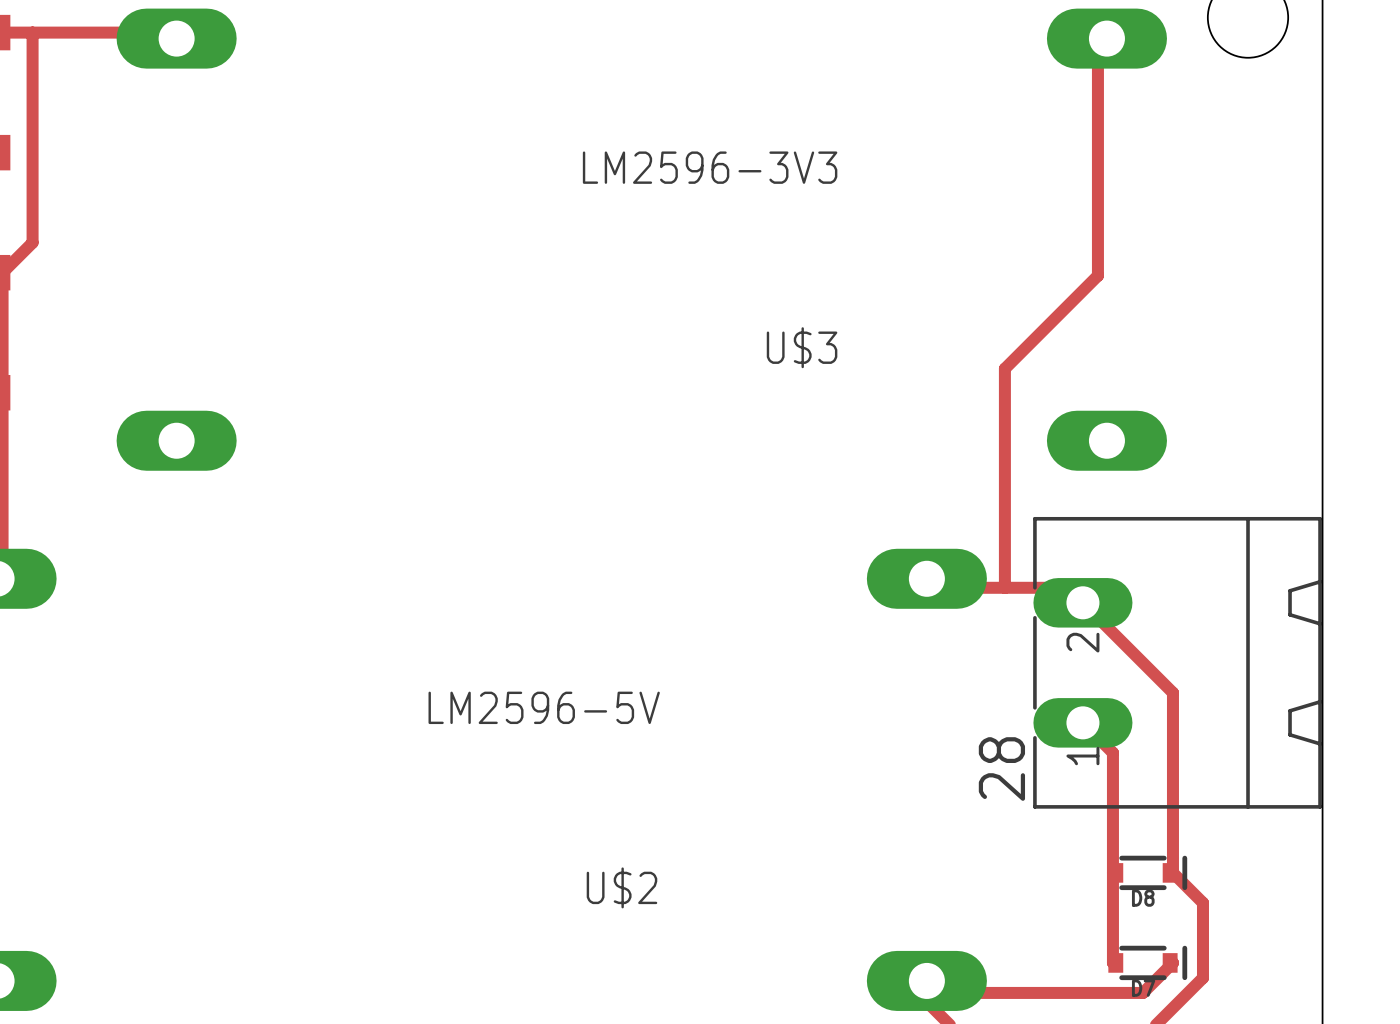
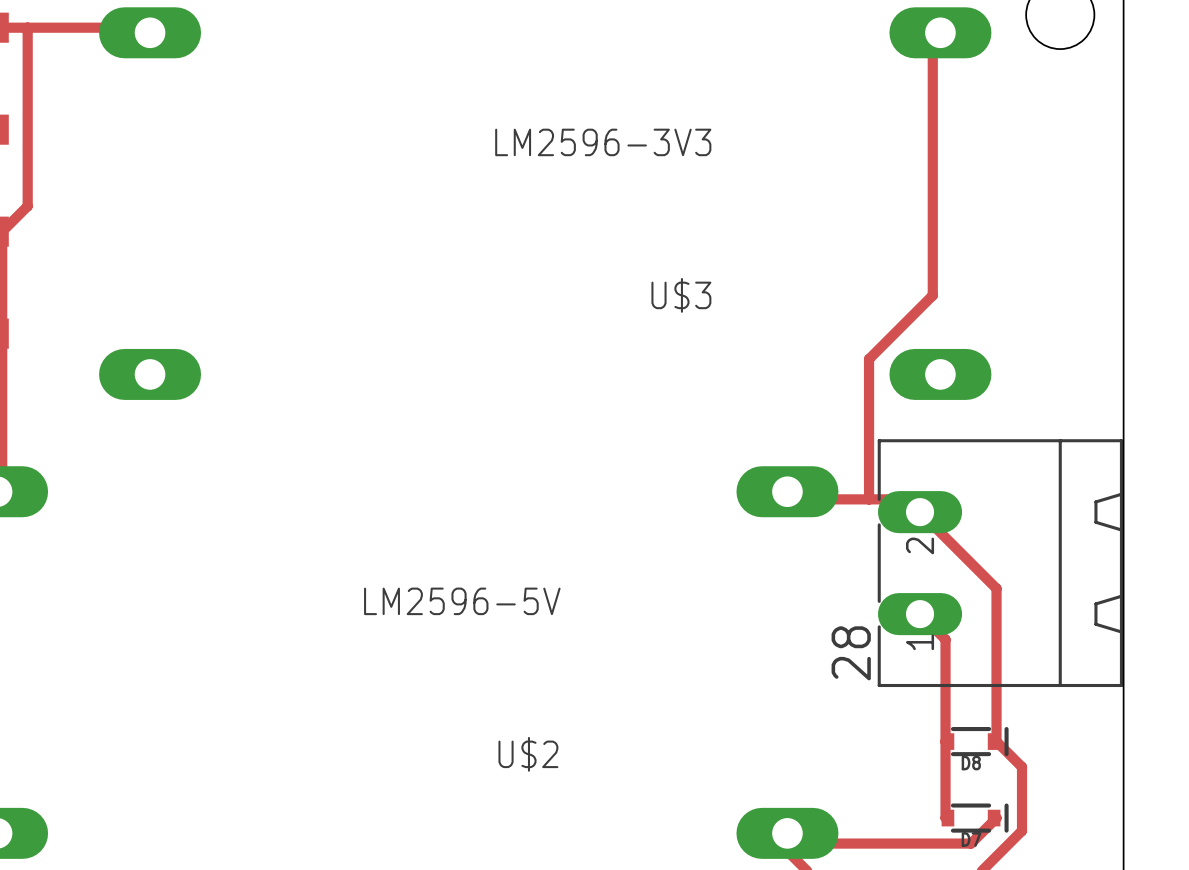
track: (1097, 275) (1004, 368) (1004, 587) -> (932, 234) (932, 295) (869, 359) (869, 499)

